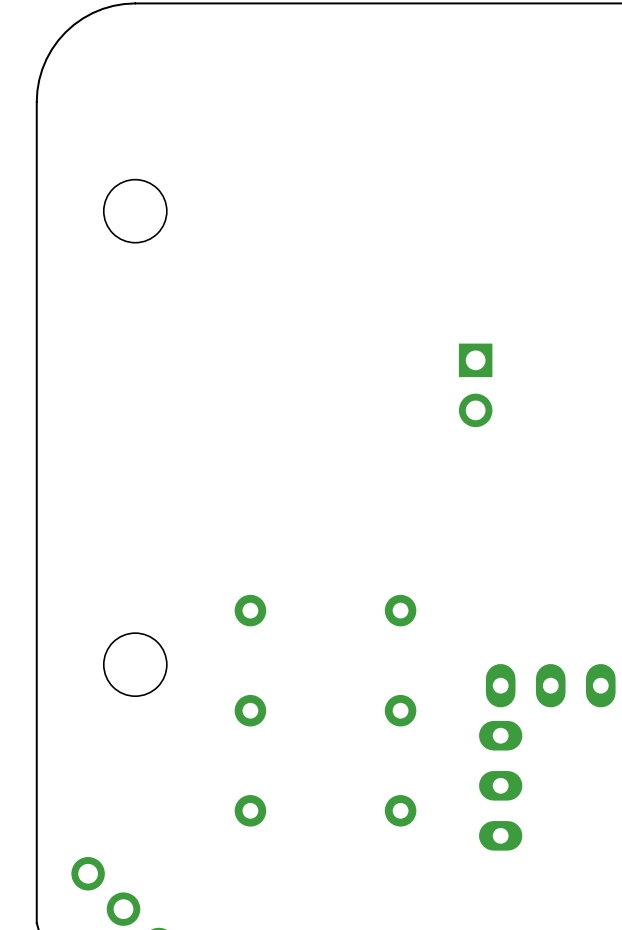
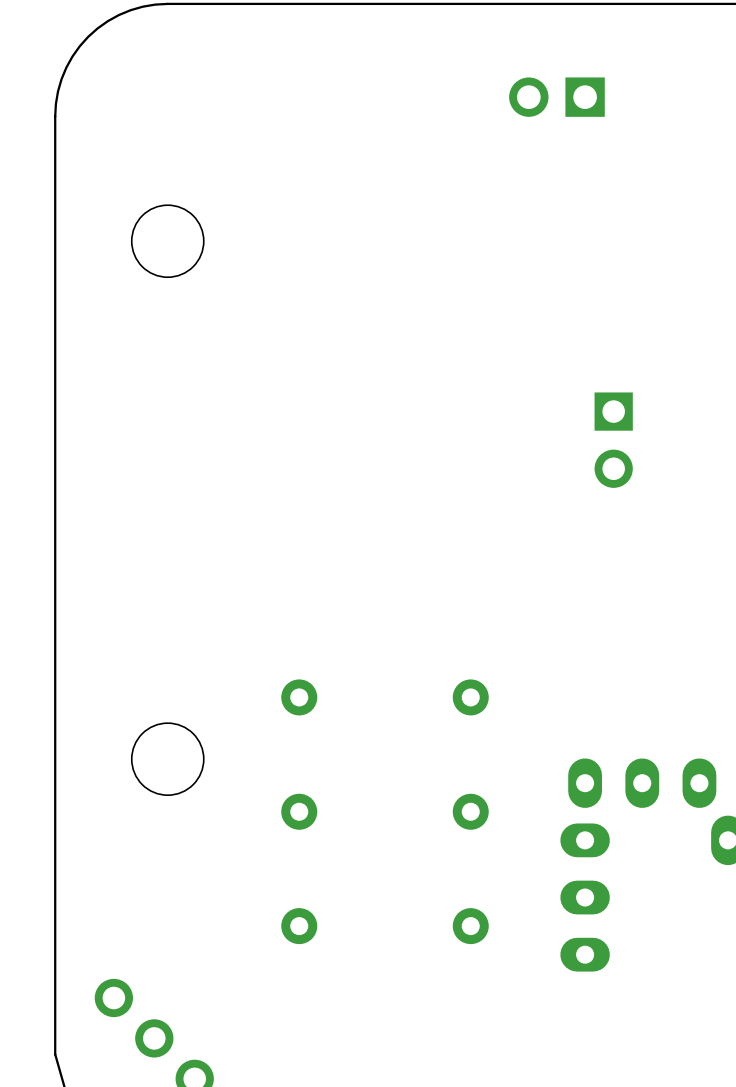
part: none -> (556, 97)
part position: (475, 385) -> (613, 440)

